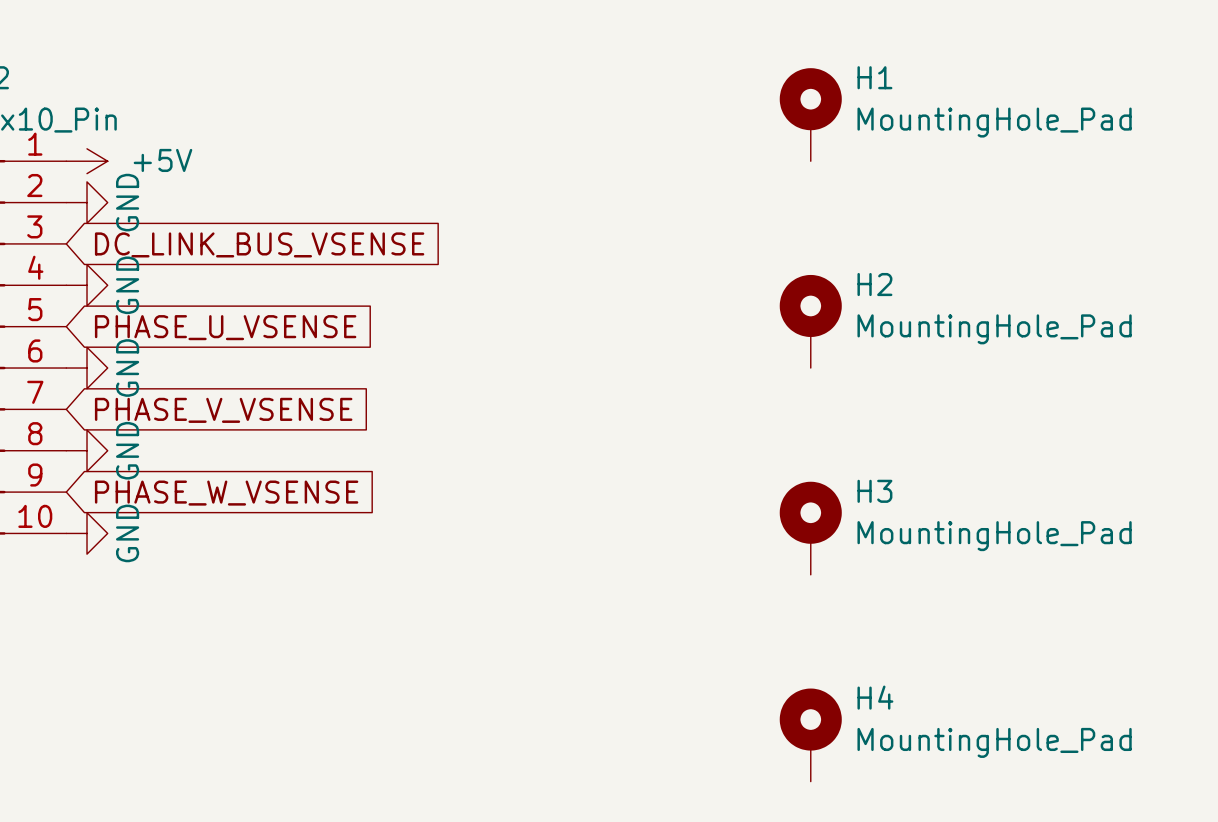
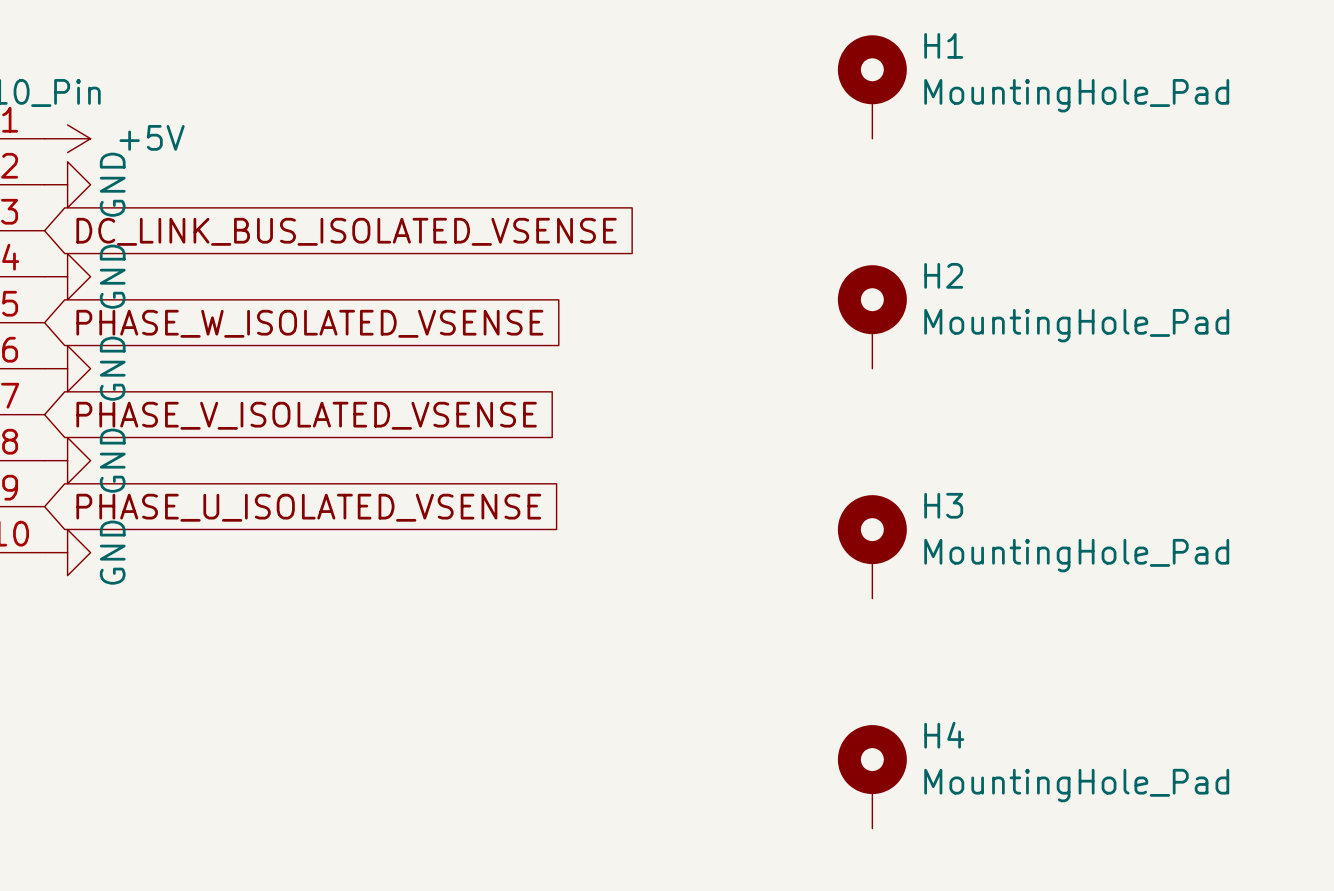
global label: DC_LINK_BUS_VSENSE (259, 244) -> DC_LINK_BUS_ISOLATED_VSENSE (346, 231)
global label: PHASE_U_VSENSE (225, 327) -> PHASE_W_ISOLATED_VSENSE (309, 323)
global label: PHASE_V_VSENSE (223, 410) -> PHASE_V_ISOLATED_VSENSE (306, 415)
global label: PHASE_W_VSENSE (226, 493) -> PHASE_U_ISOLATED_VSENSE (308, 507)

